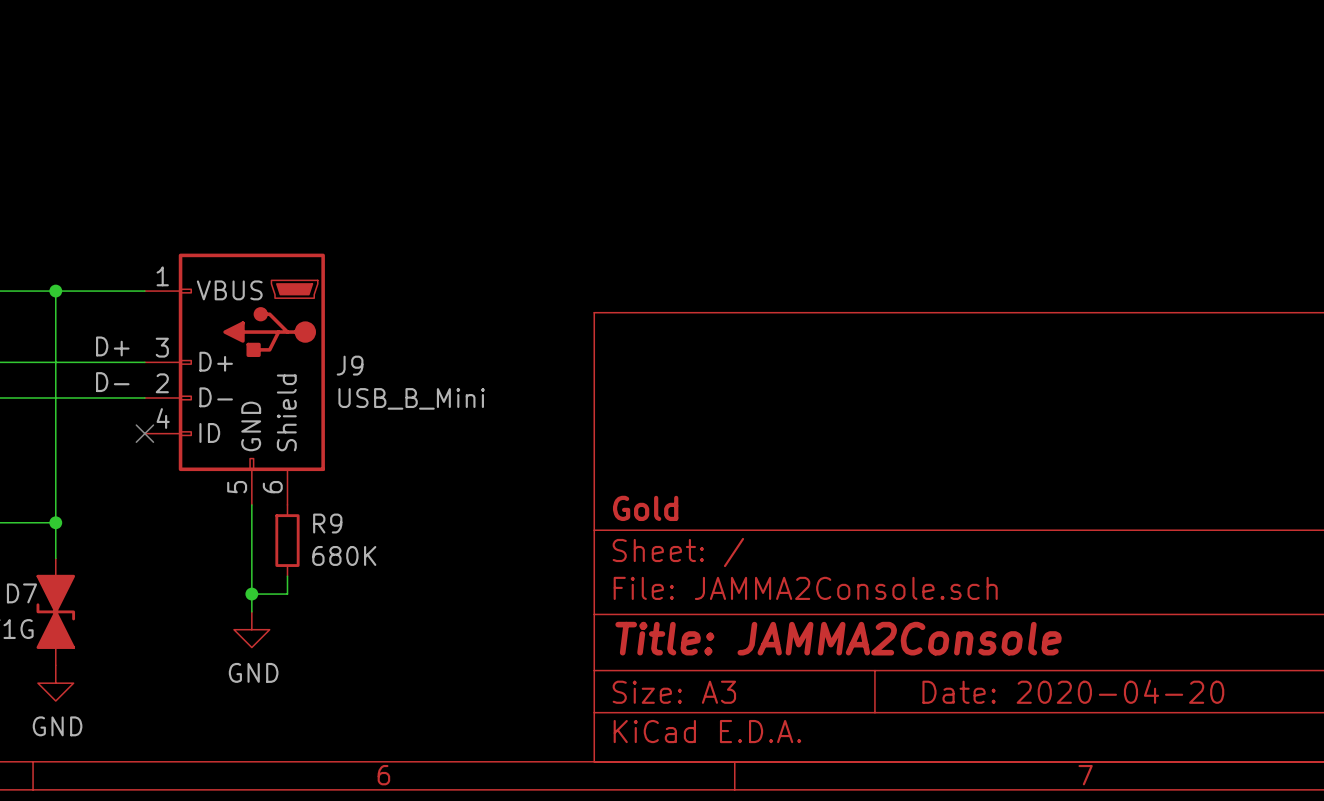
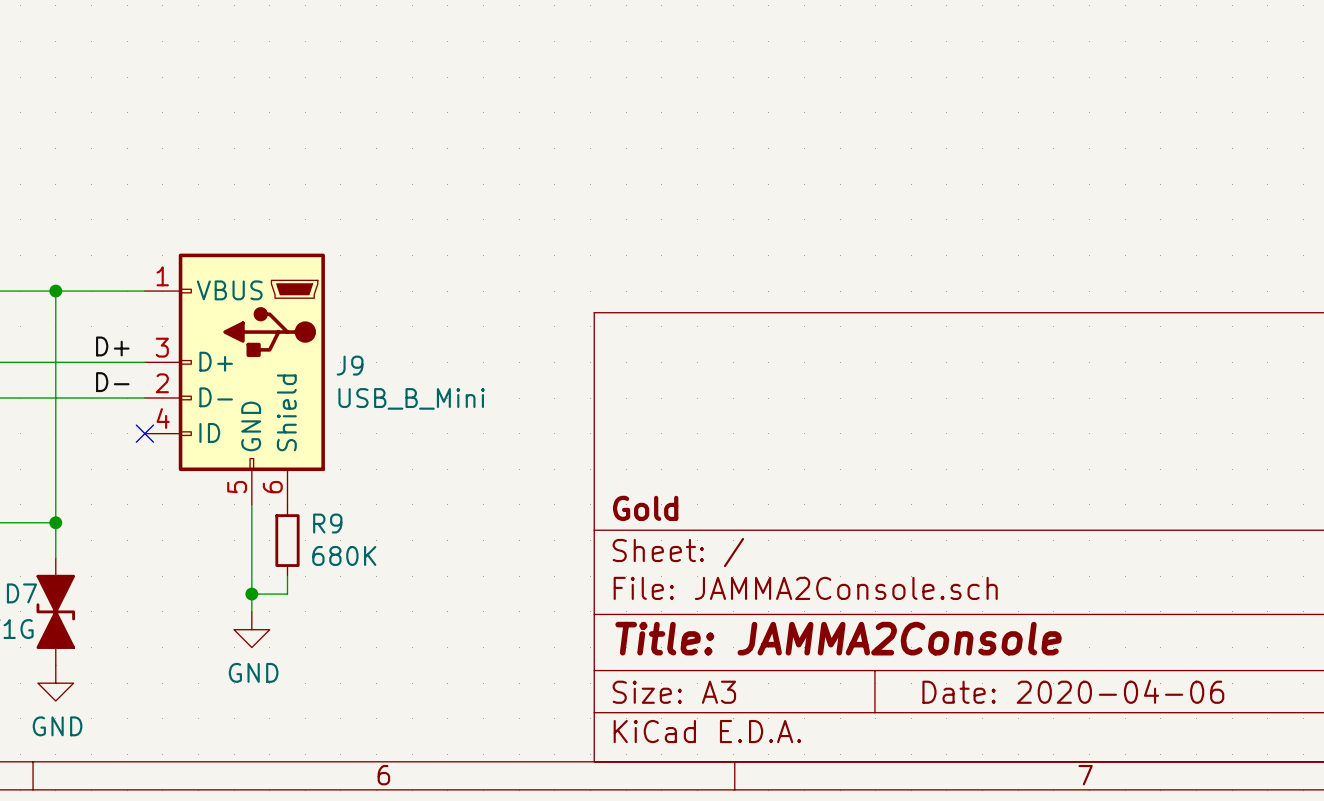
title block: Date: 2020-04-20 (1073, 691) -> Date: 2020-04-06 (1073, 691)

